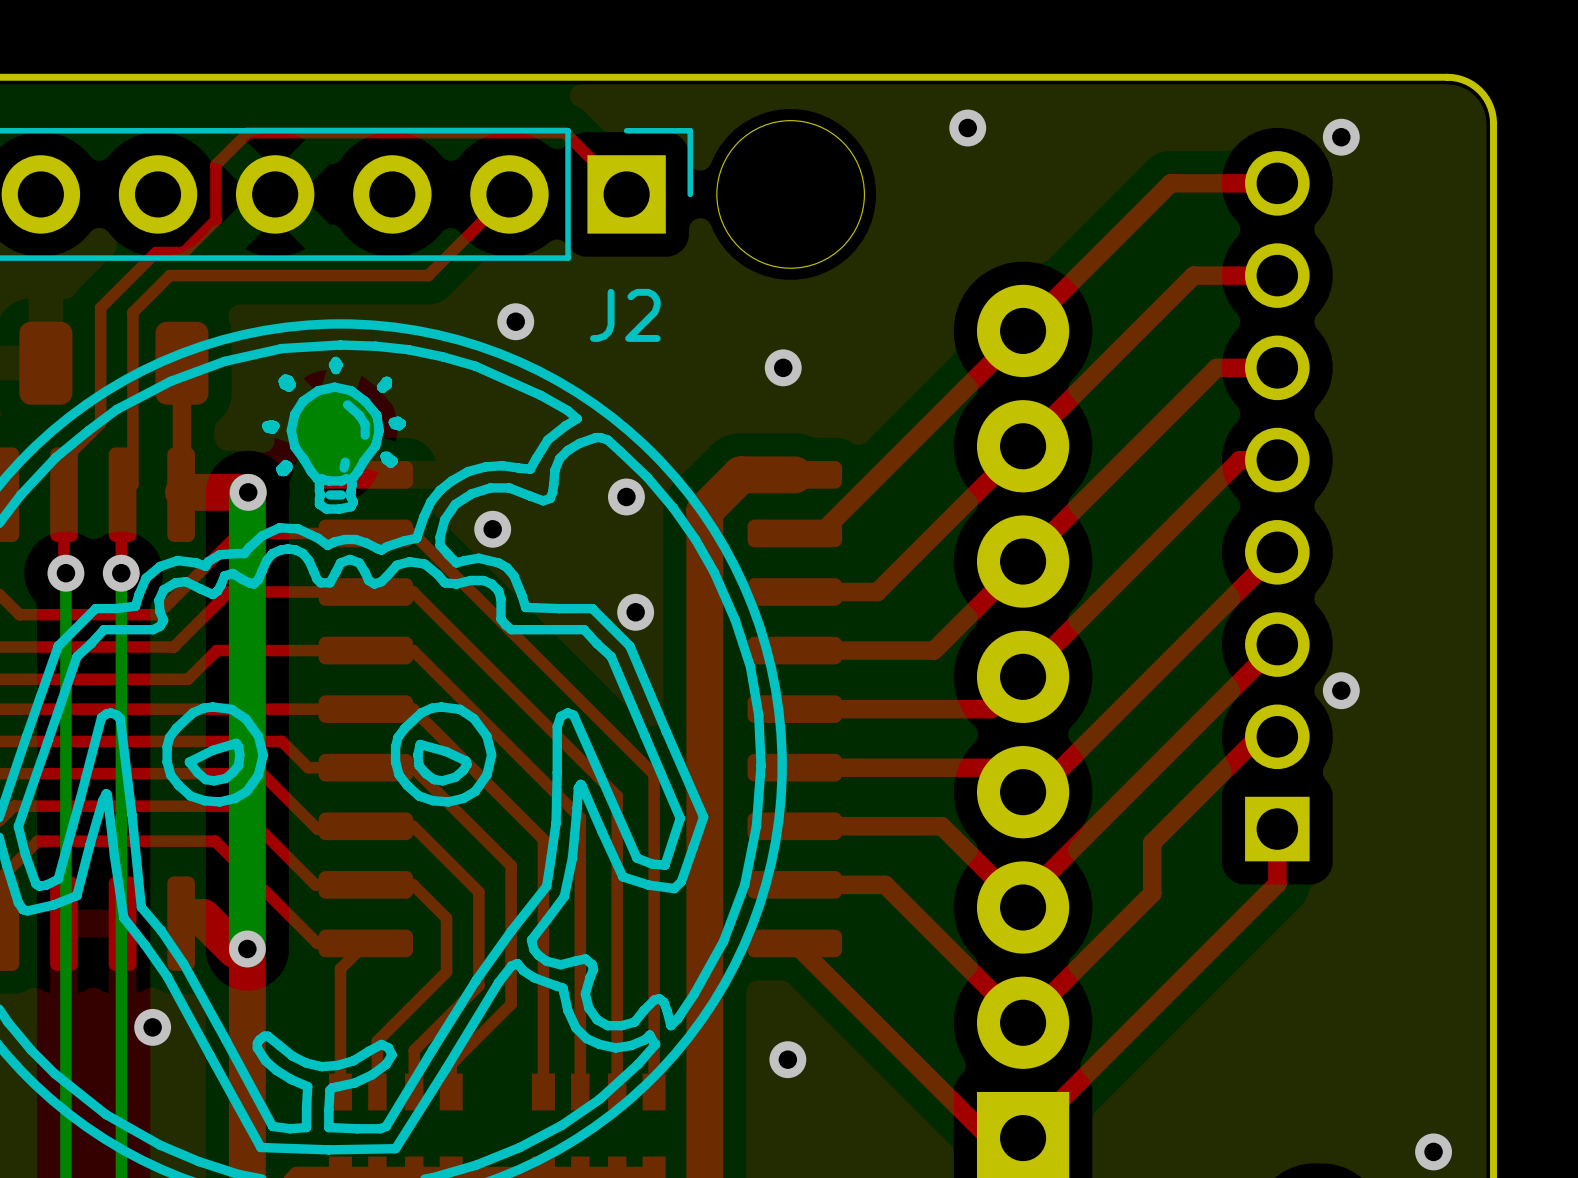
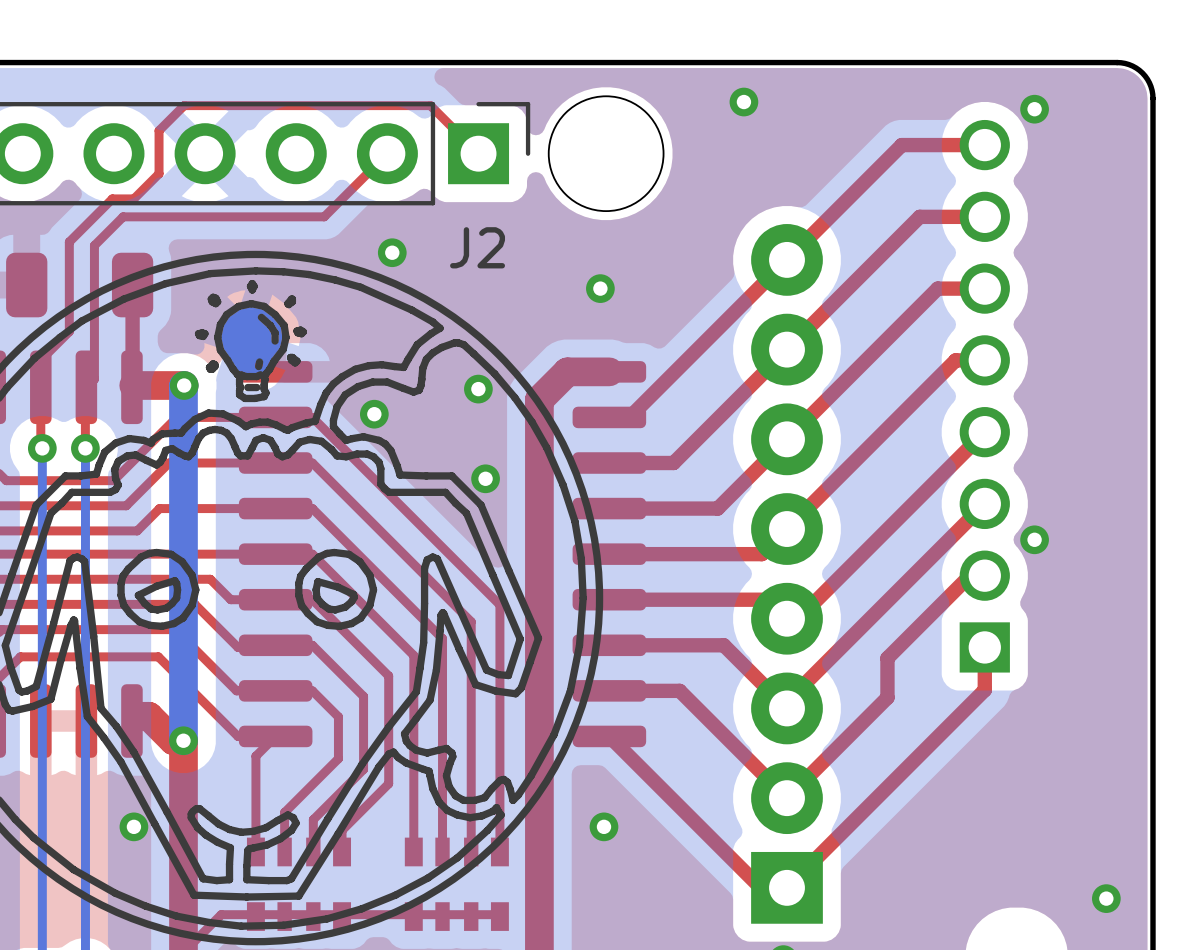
via position: (152, 1027) -> (133, 826)

